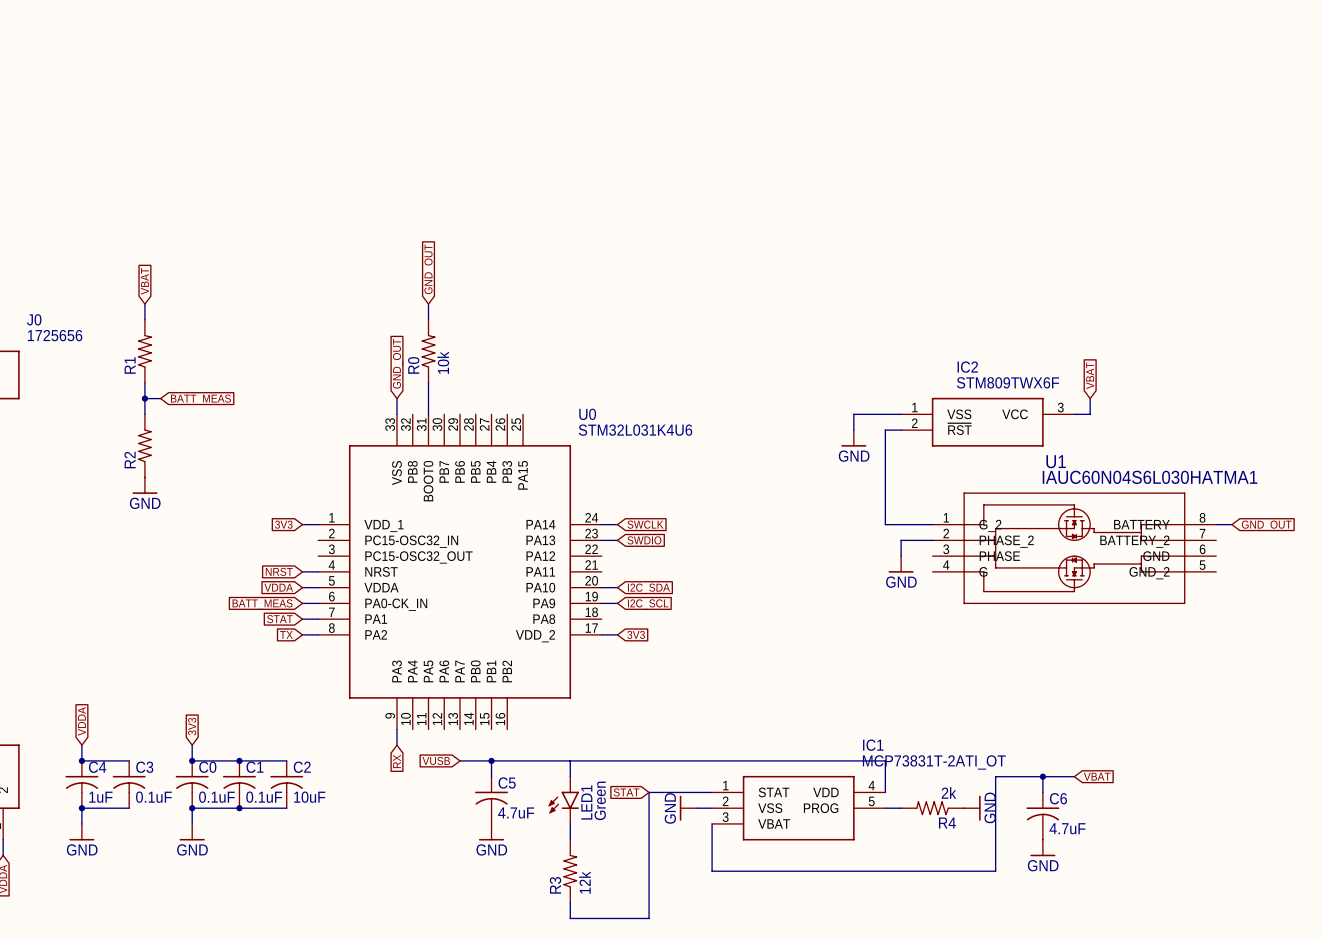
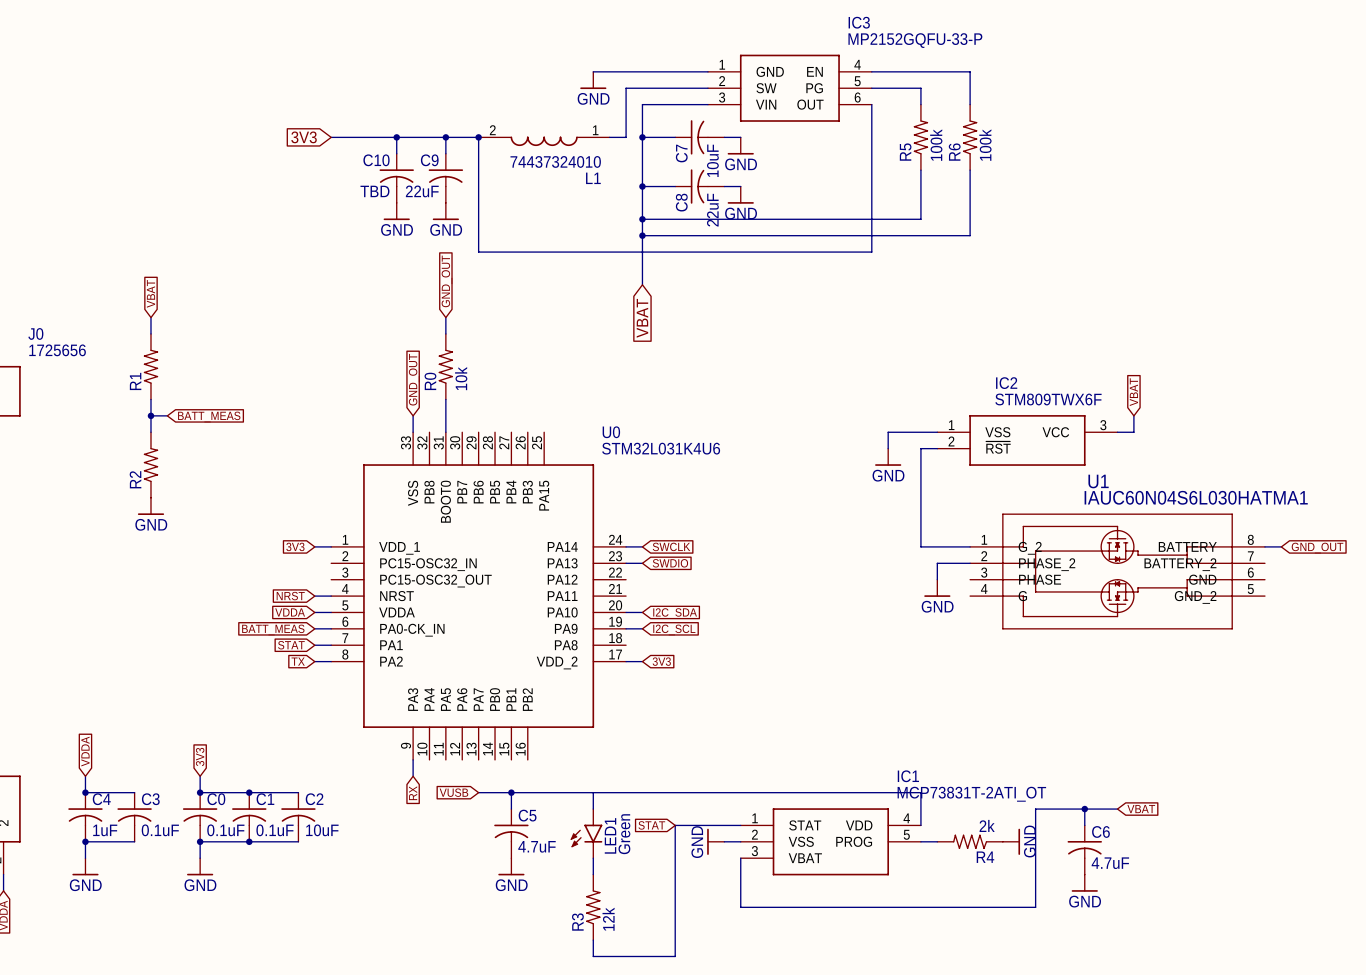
wire: none -> (593, 71) (707, 71)
wire: none -> (871, 71) (970, 71) (970, 104)
power symbol: none -> GND (593, 80)
wire: none -> (707, 88) (626, 88) (626, 137) (609, 137)
IC3: none -> MP2152GQFU-33-P (789, 88)
wire: none -> (871, 88) (920, 88) (920, 104)
wire: none -> (707, 104) (642, 104) (642, 284)
wire: none -> (871, 104) (871, 252) (478, 252) (478, 137) (331, 137)
global label: none -> 3V3 (304, 137)
wire: none -> (396, 137) (396, 153)
junction: none -> (396, 137)
wire: none -> (445, 137) (445, 153)
junction: none -> (445, 137)
junction: none -> (478, 137)
wire: none -> (642, 137) (675, 137)
junction: none -> (642, 137)
C7: none -> 10uF (699, 137)
wire: none -> (724, 137) (740, 137)
R5: none -> 100k (920, 137)
R6: none -> 100k (970, 137)
L1: none -> 74437324010 (544, 141)
power symbol: none -> GND (740, 145)
wire: none -> (920, 170) (920, 219) (642, 219)
wire: none -> (970, 170) (970, 235) (642, 235)
C10: none -> TBD (396, 178)
C9: none -> 22uF (445, 178)
wire: none -> (642, 186) (675, 186)
junction: none -> (642, 186)
C8: none -> 22uF (699, 186)
wire: none -> (724, 186) (740, 186)
power symbol: none -> GND (740, 195)
power symbol: none -> GND (396, 211)
power symbol: none -> GND (445, 211)
junction: none -> (642, 219)
junction: none -> (642, 235)
global label: none -> VBAT (642, 318)

